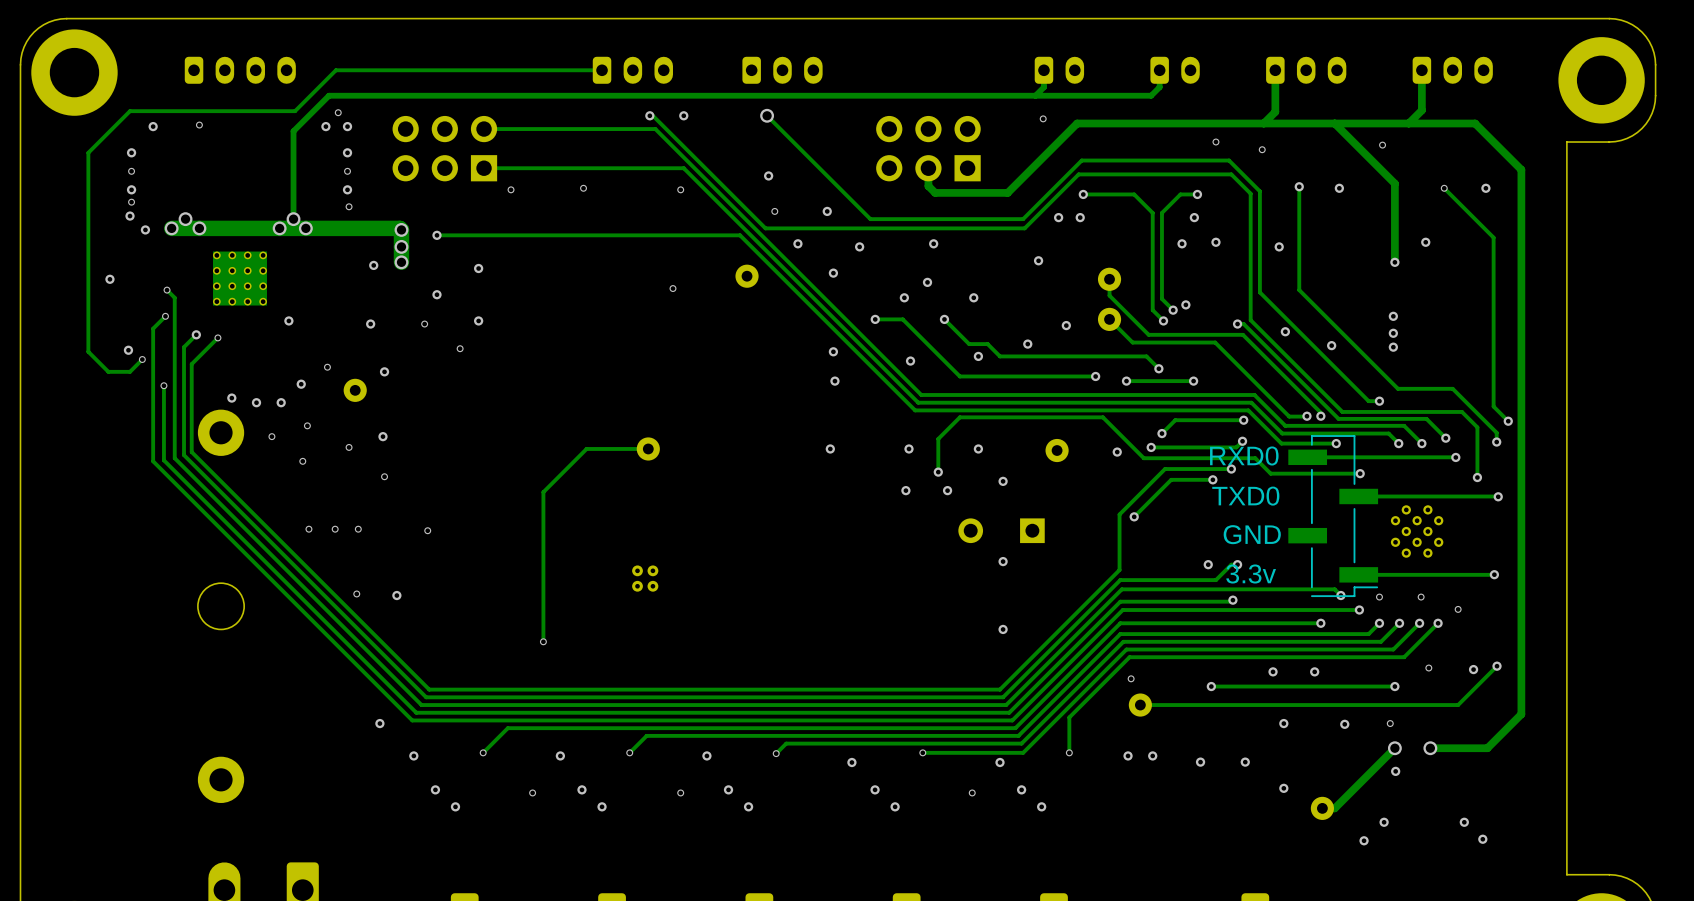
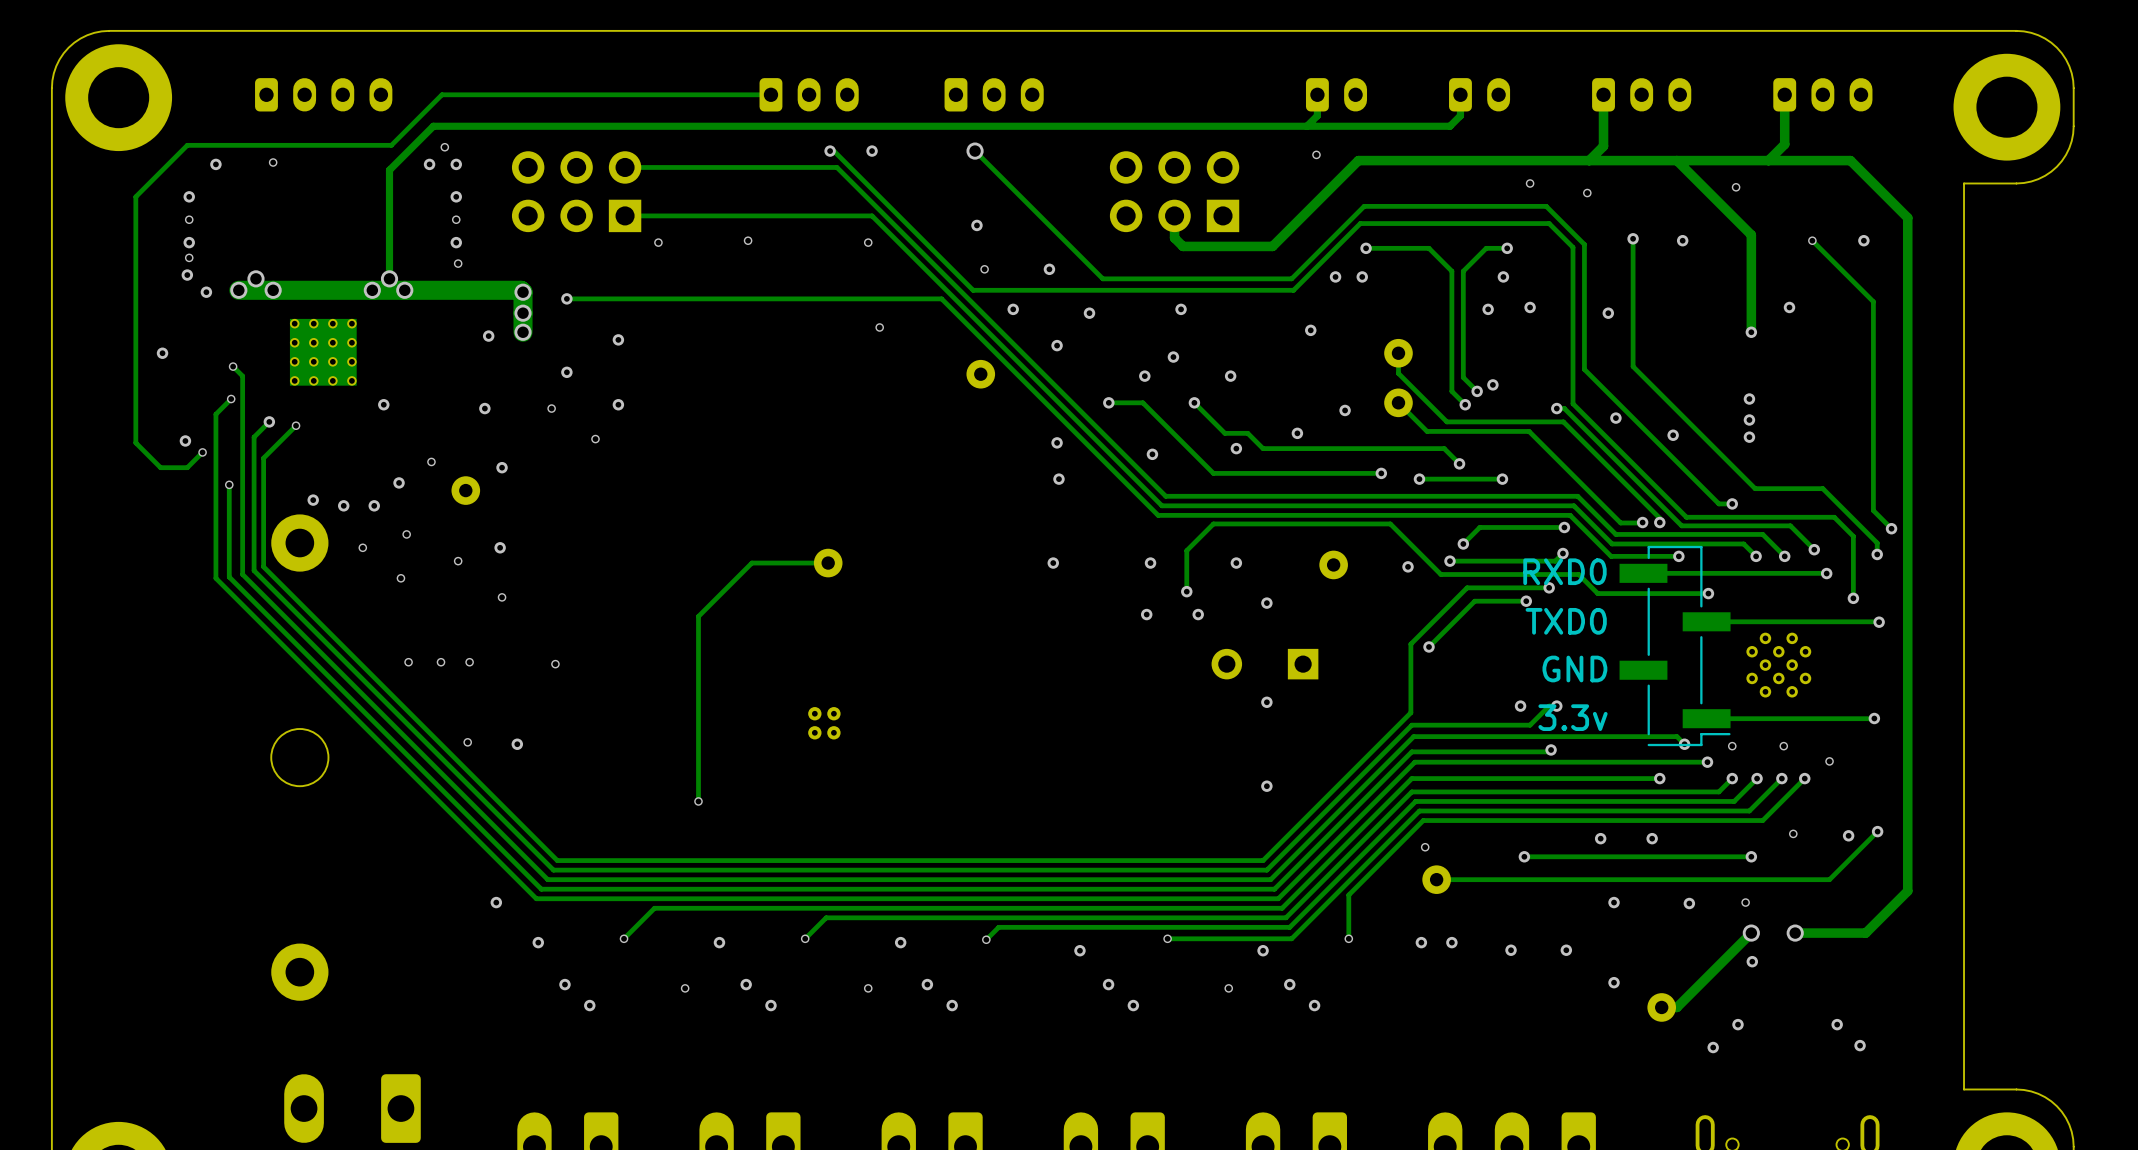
part position: (747, 276) -> (980, 374)
via position: (672, 288) -> (879, 327)

